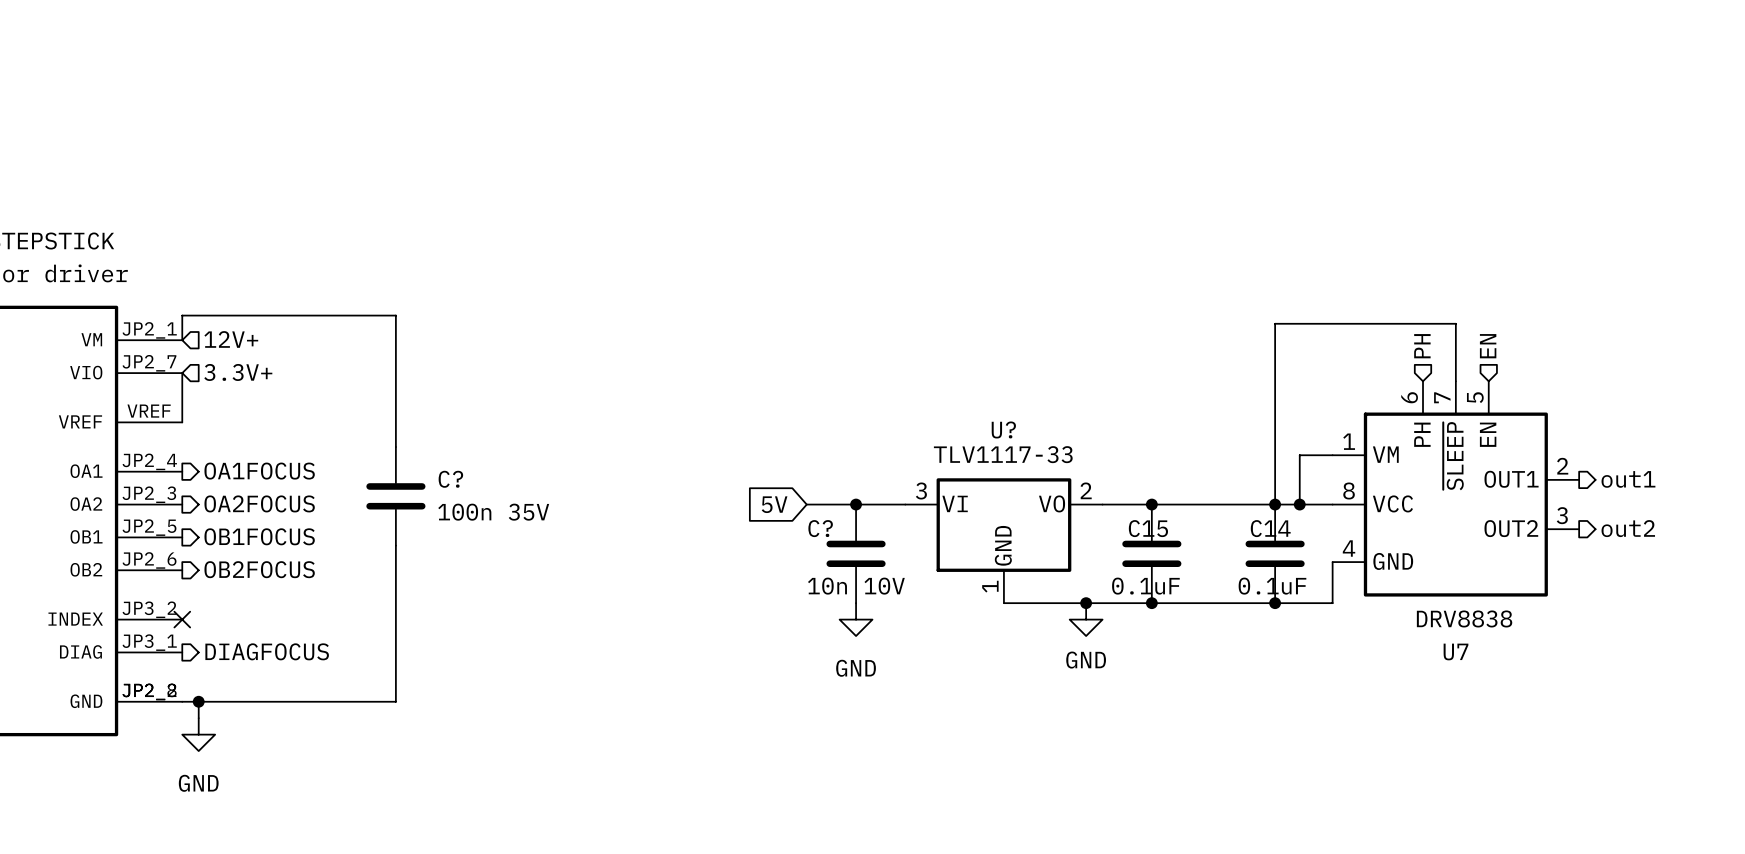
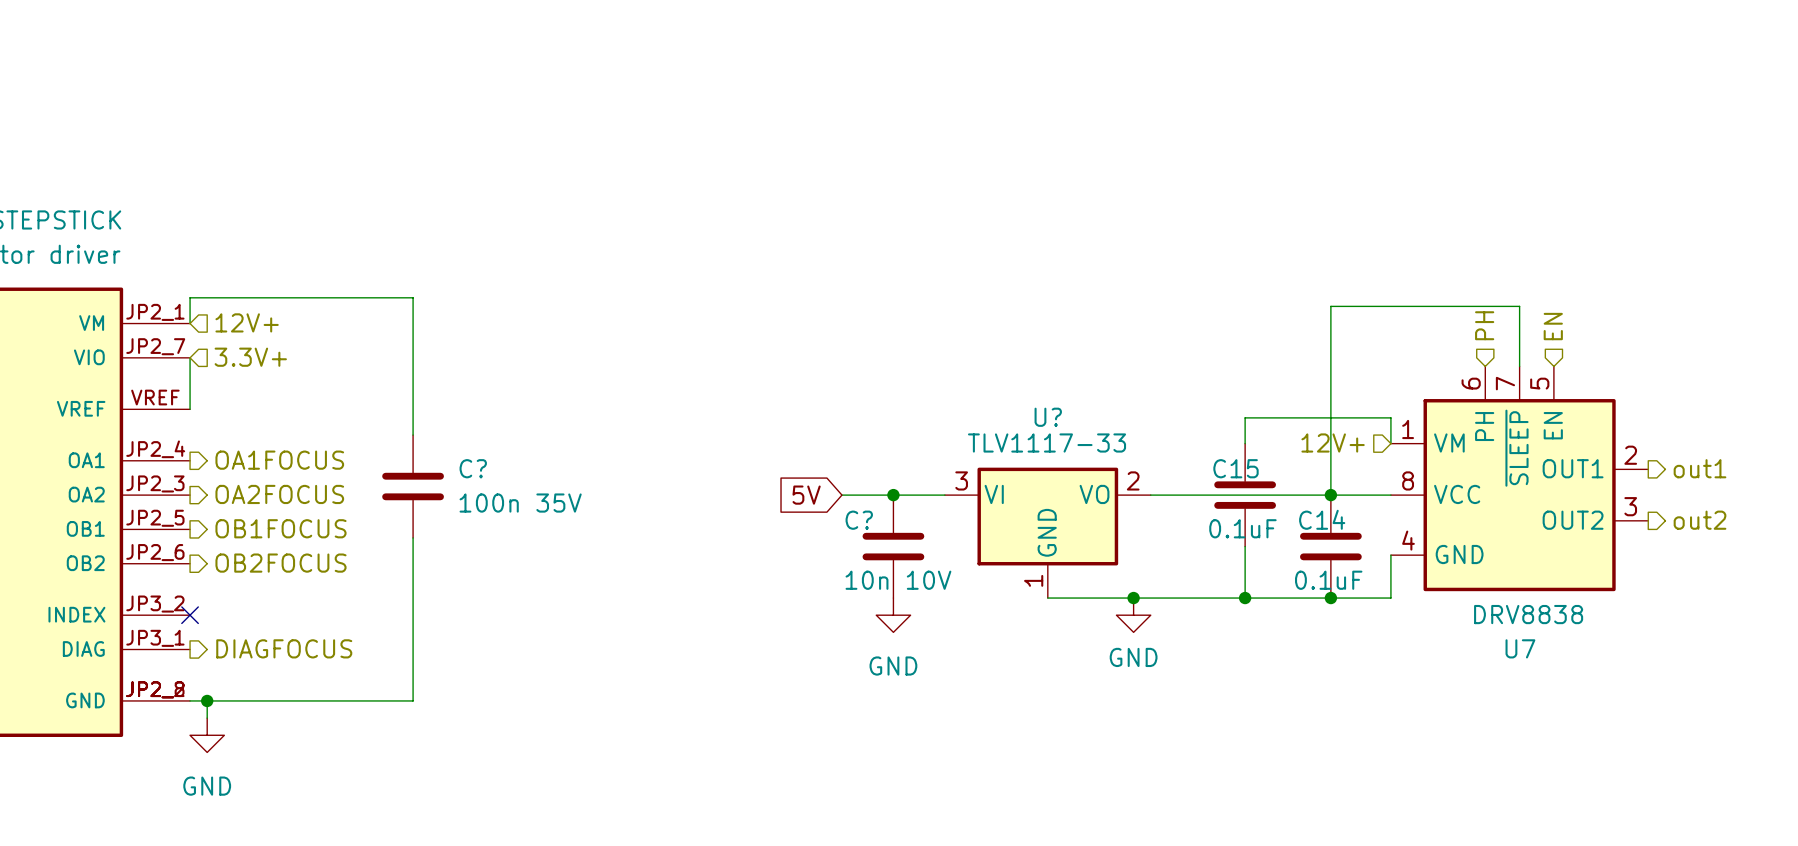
hierarchical label: none -> 12V+ (1333, 442)
wire: (1332, 455) (1299, 455) (1299, 504) -> (1390, 443) (1390, 417) (1245, 417) (1245, 443)
junction: (1151, 504) -> none
junction: (1299, 504) -> none
C15 name position: C15 (1148, 528) -> C15 (1236, 468)
C15 position: (1151, 553) -> (1245, 495)
wire: none -> (1245, 546) (1245, 598)
C15 value position: 0.1uF (1145, 586) -> 0.1uF (1242, 528)
junction position: (1151, 603) -> (1245, 598)

